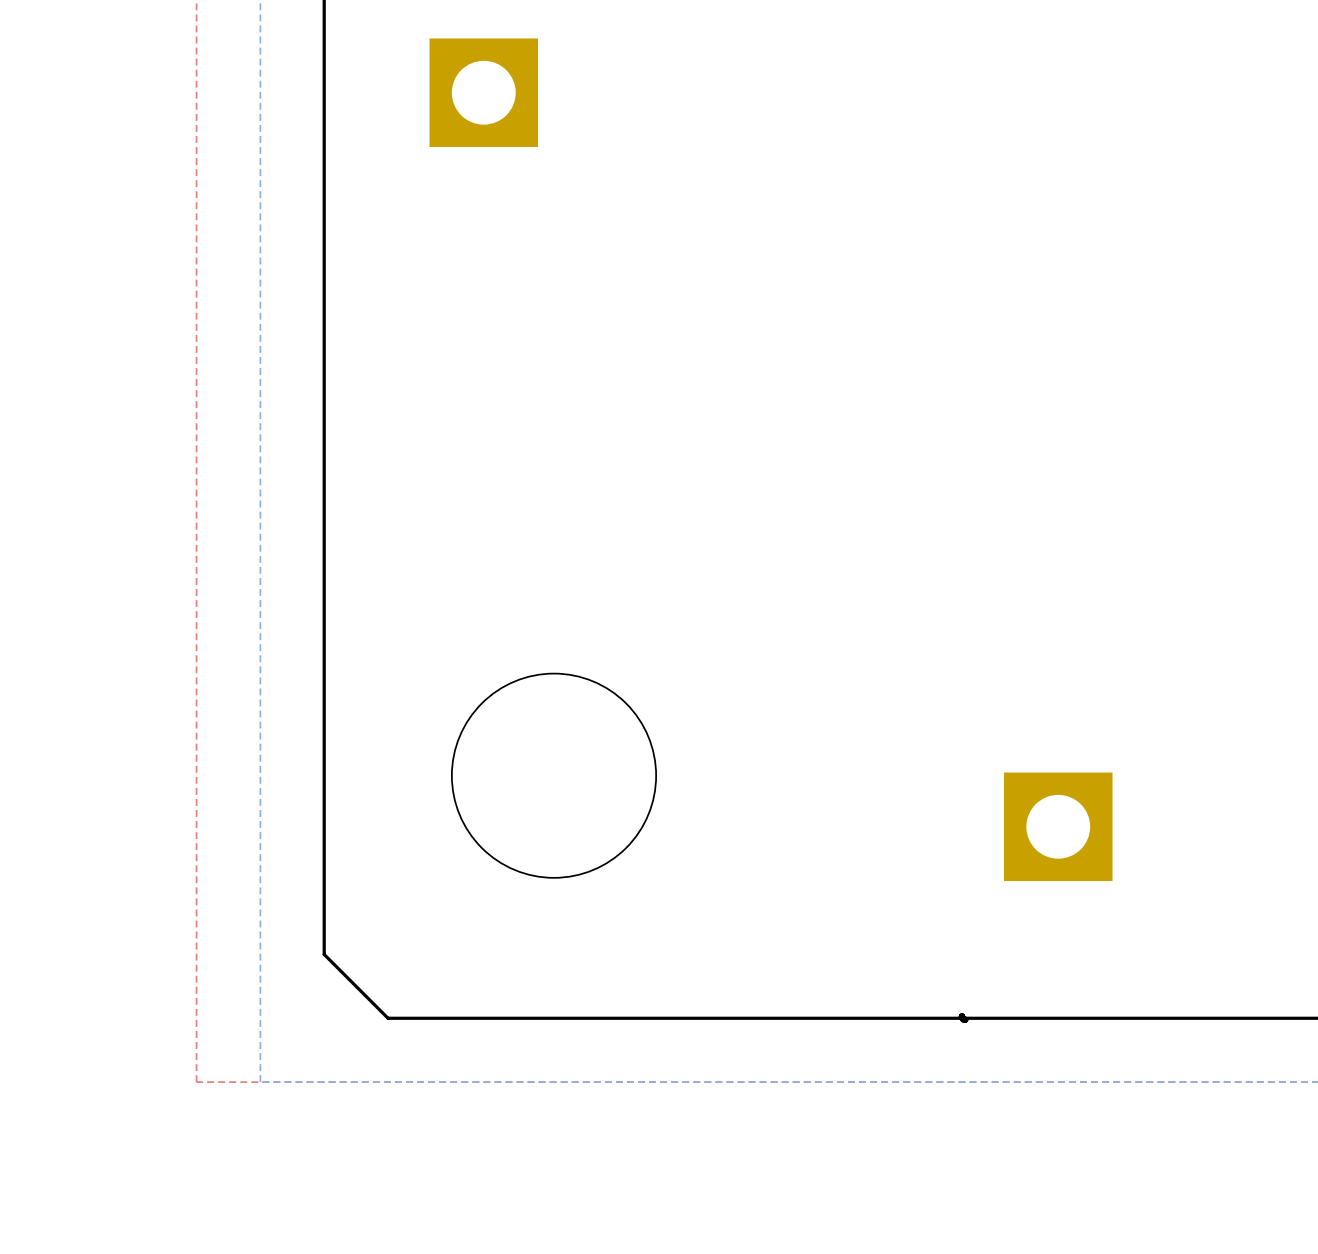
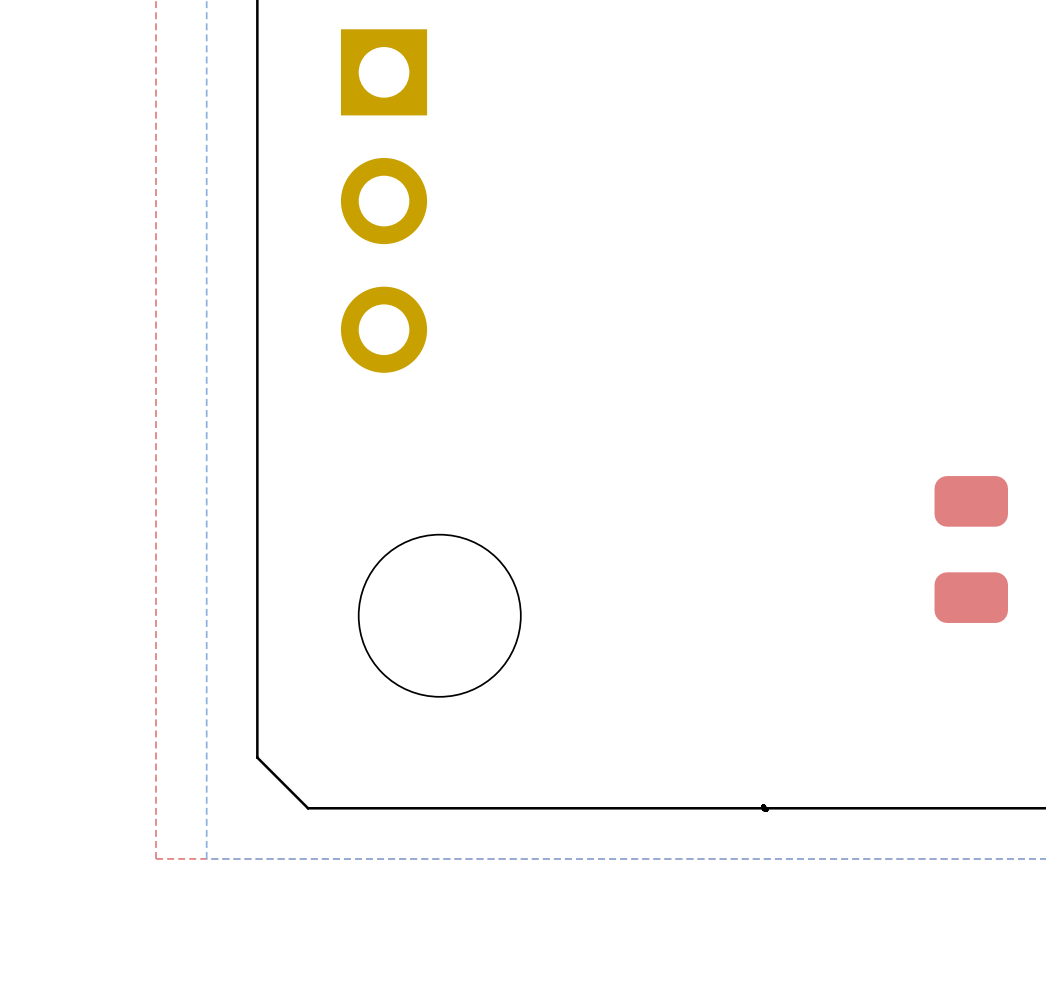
part: (483, 92) -> none
part: none -> (384, 201)
part: none -> (971, 549)
part: (1058, 826) -> none

